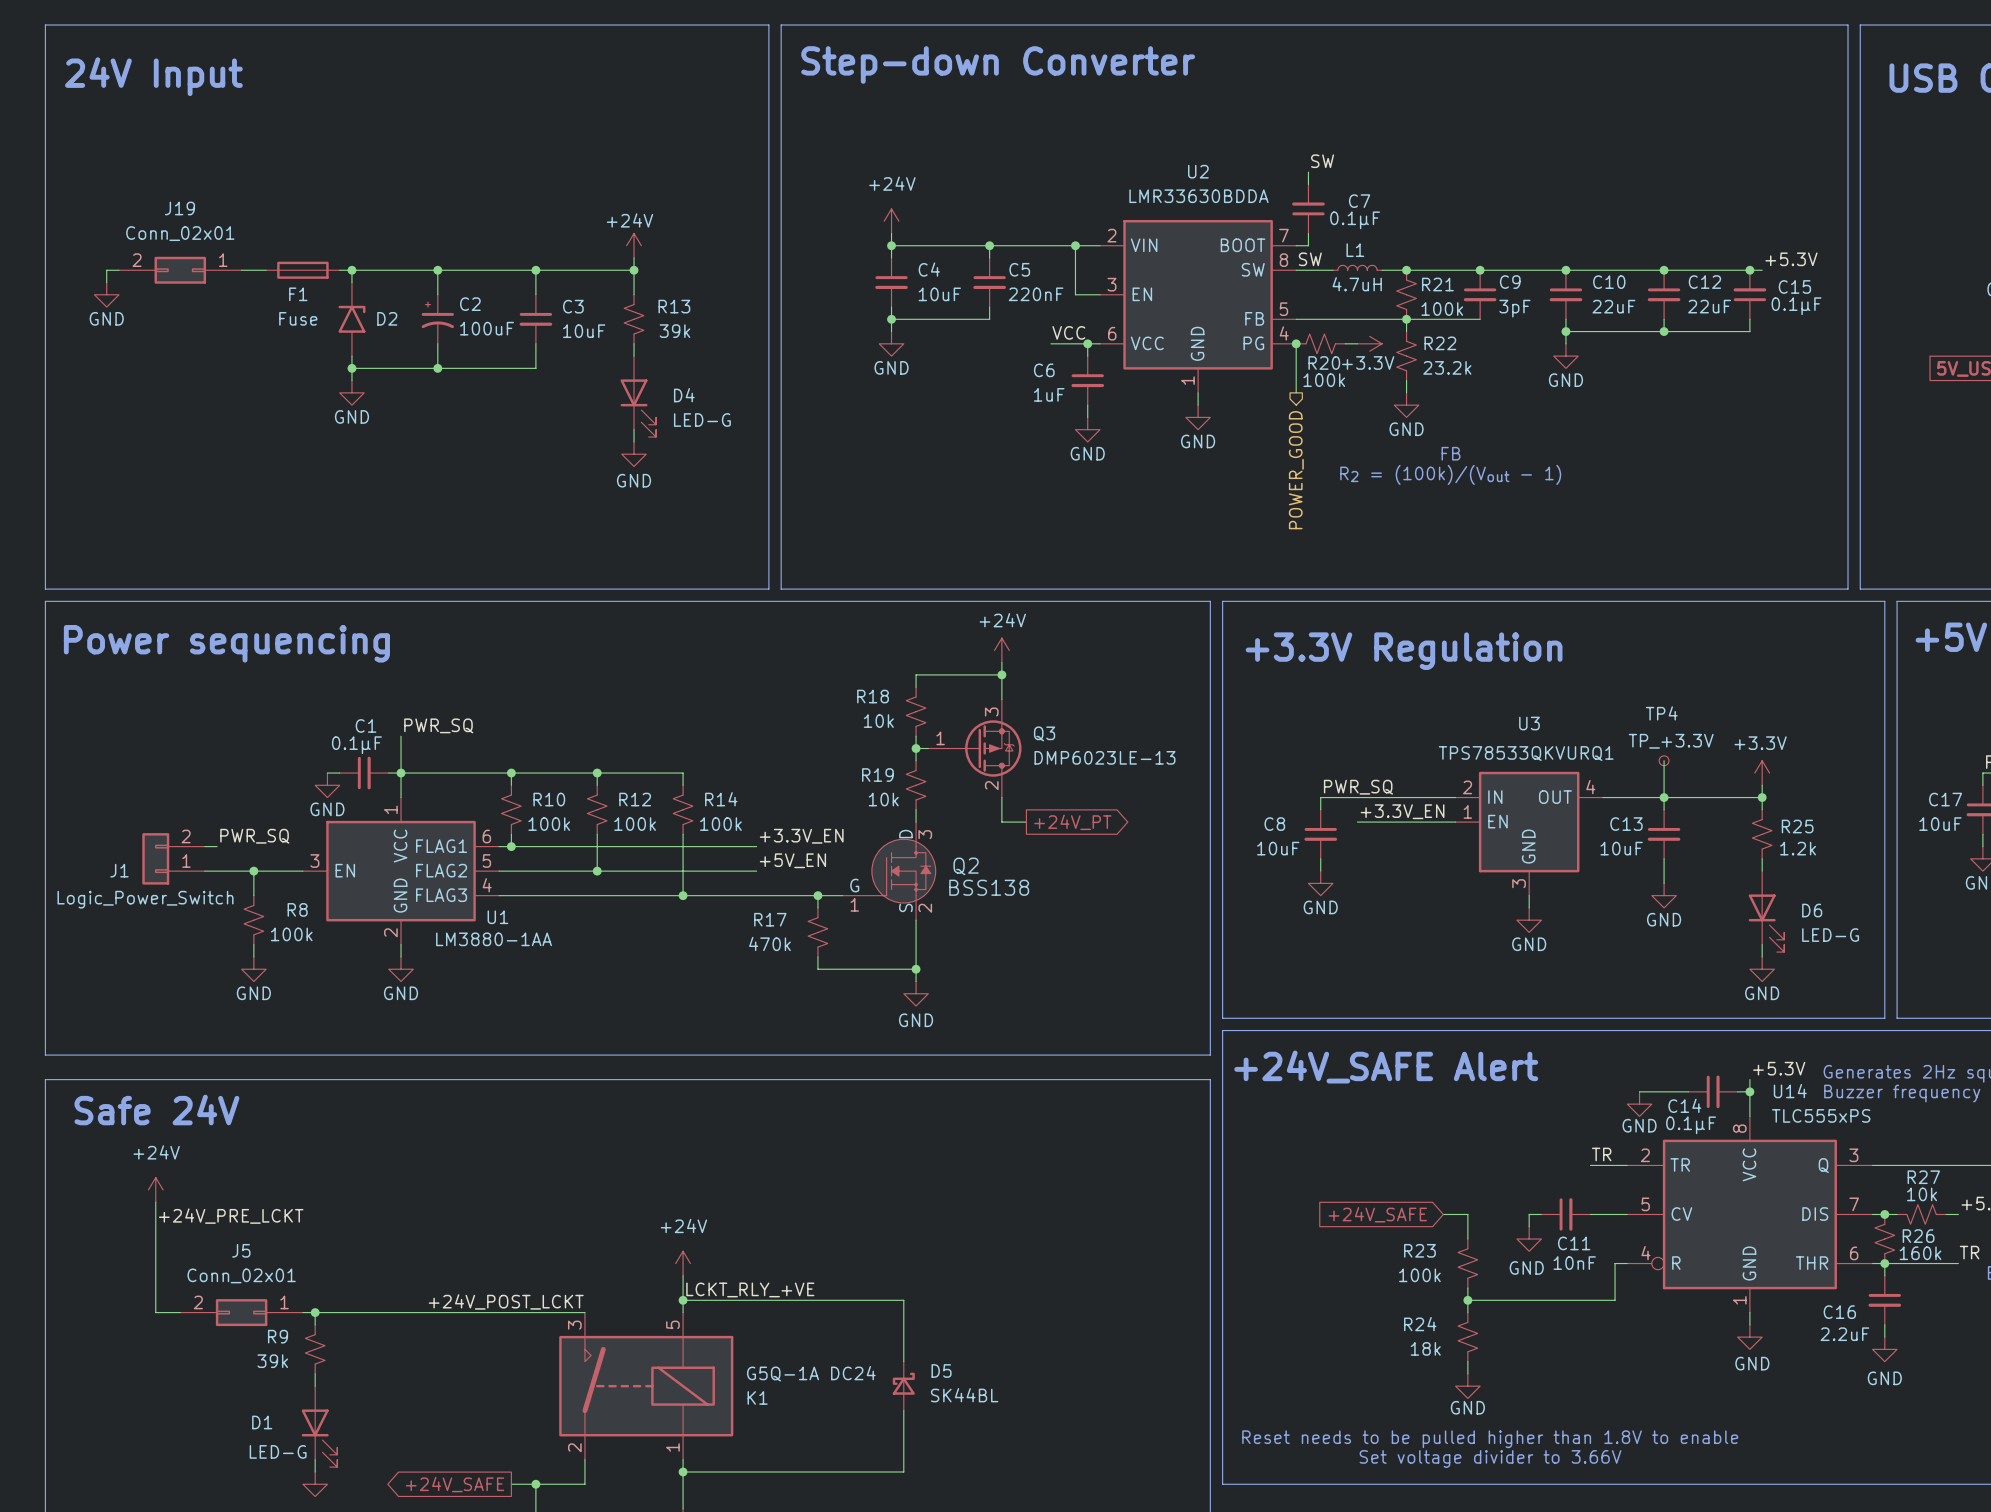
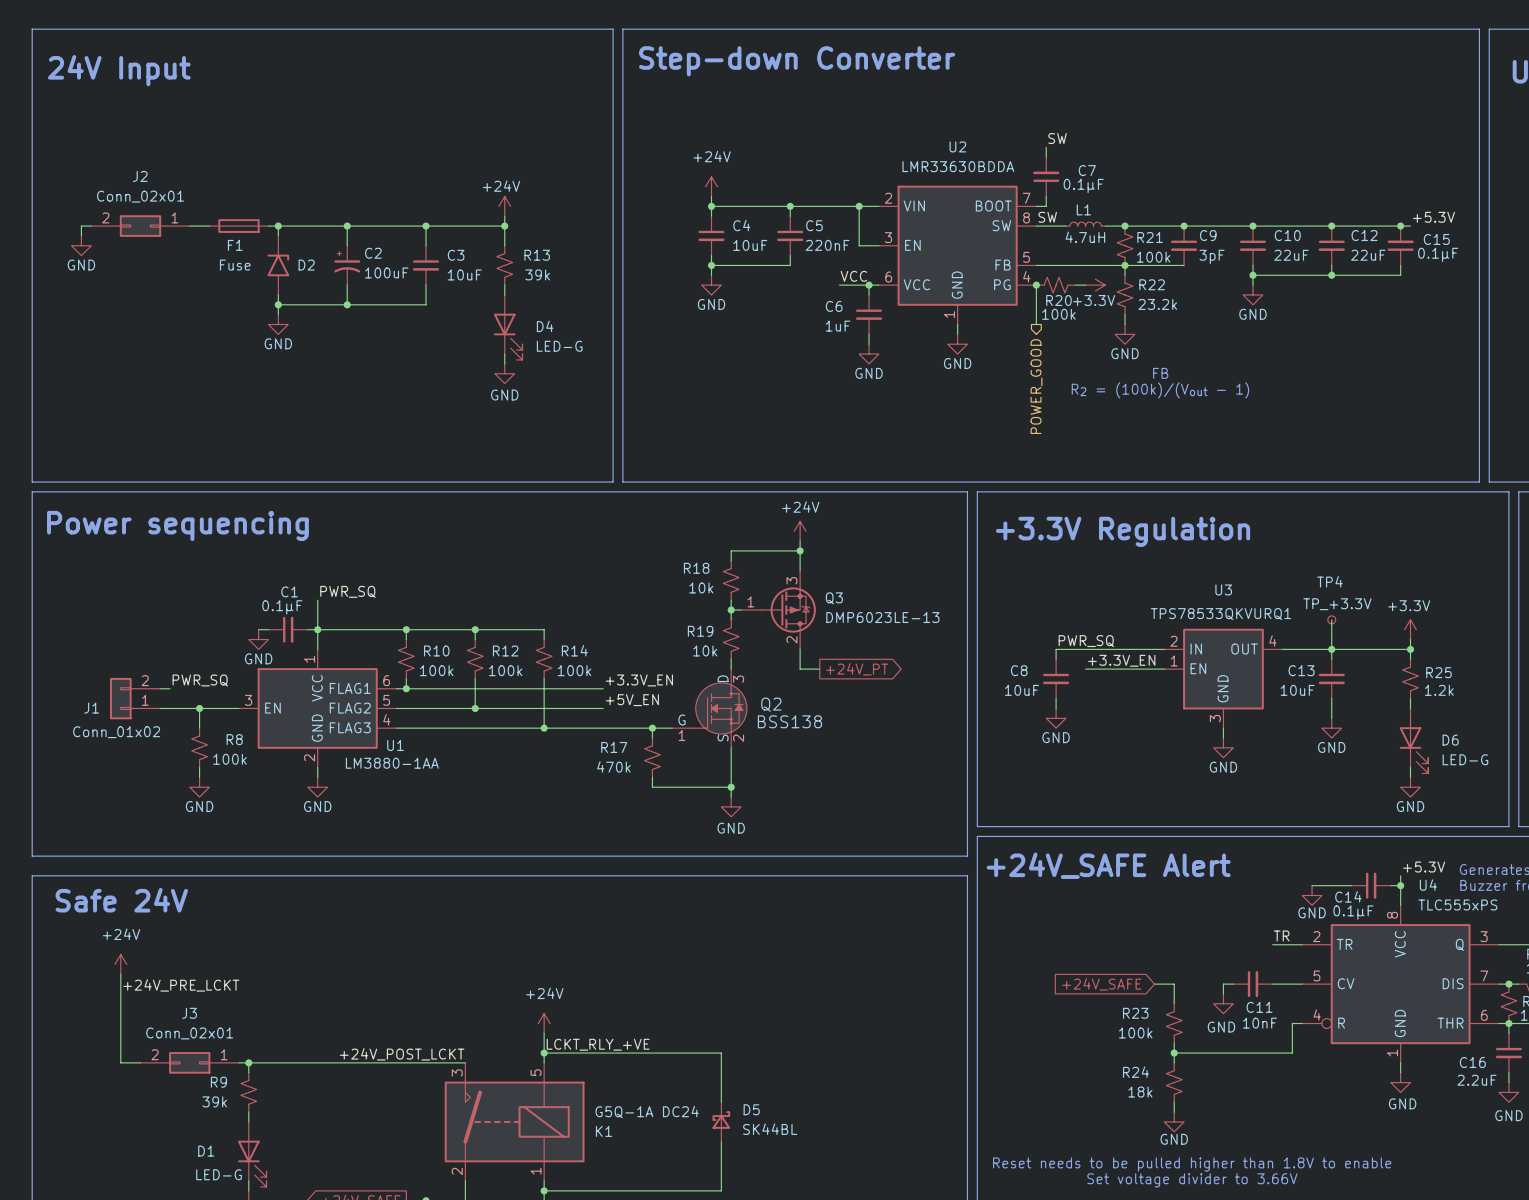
J19 name: J19 (180, 208) -> J2 (140, 176)
J1 value: Logic_Power_Switch (145, 899) -> Conn_01x02 (116, 732)
U14 name: U14 (1790, 1091) -> U4 (1428, 885)
J5 name: J5 (241, 1250) -> J3 (189, 1013)

